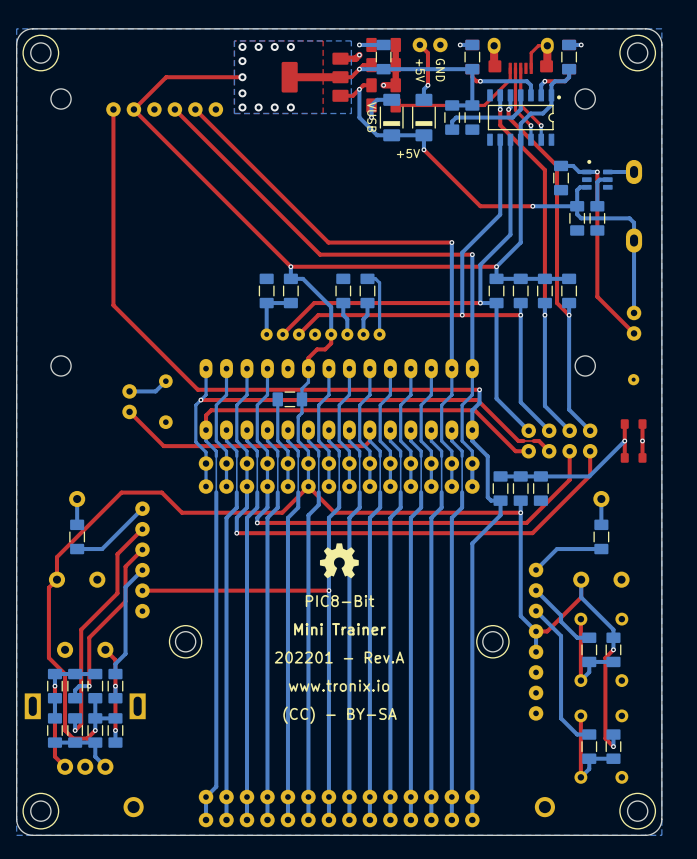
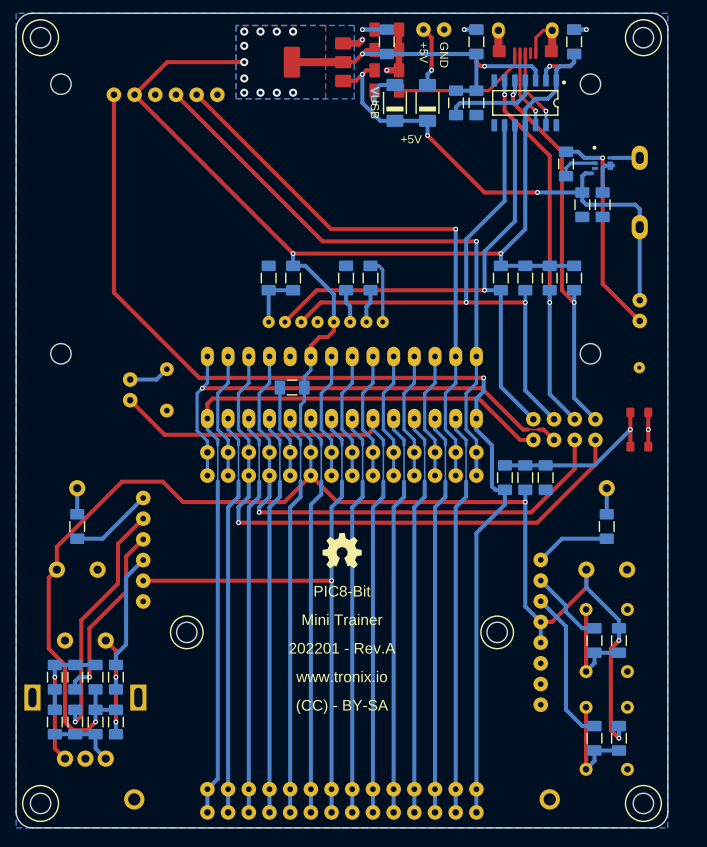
part footprint: [582, 169, 613, 190] -> [592, 156, 614, 171]
bottom track: none -> (594, 163) (570, 163) (566, 168) (566, 176)

